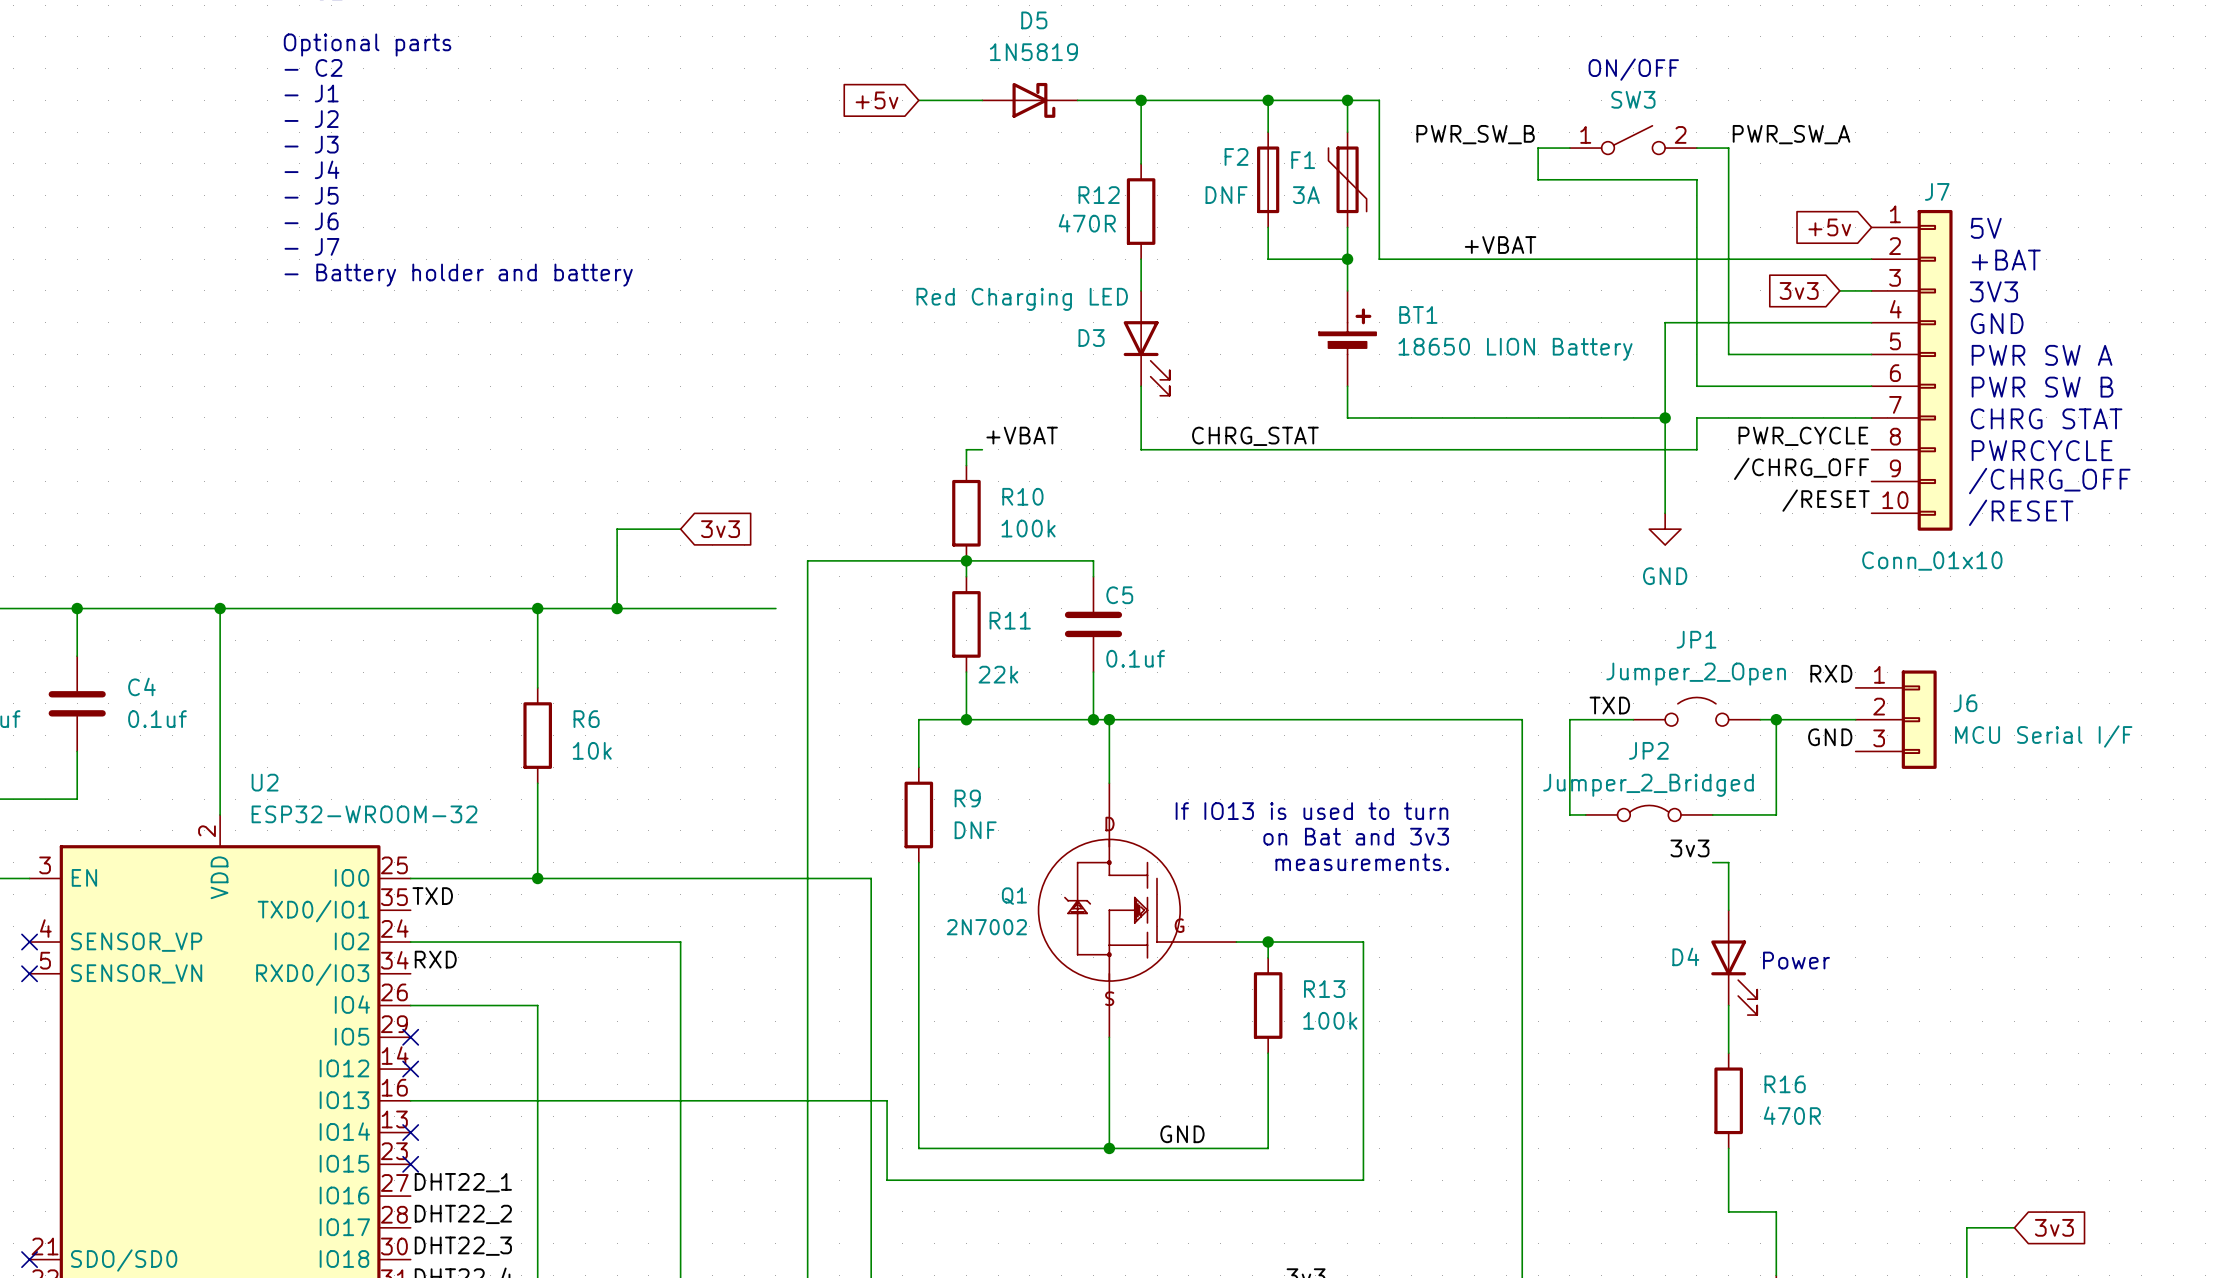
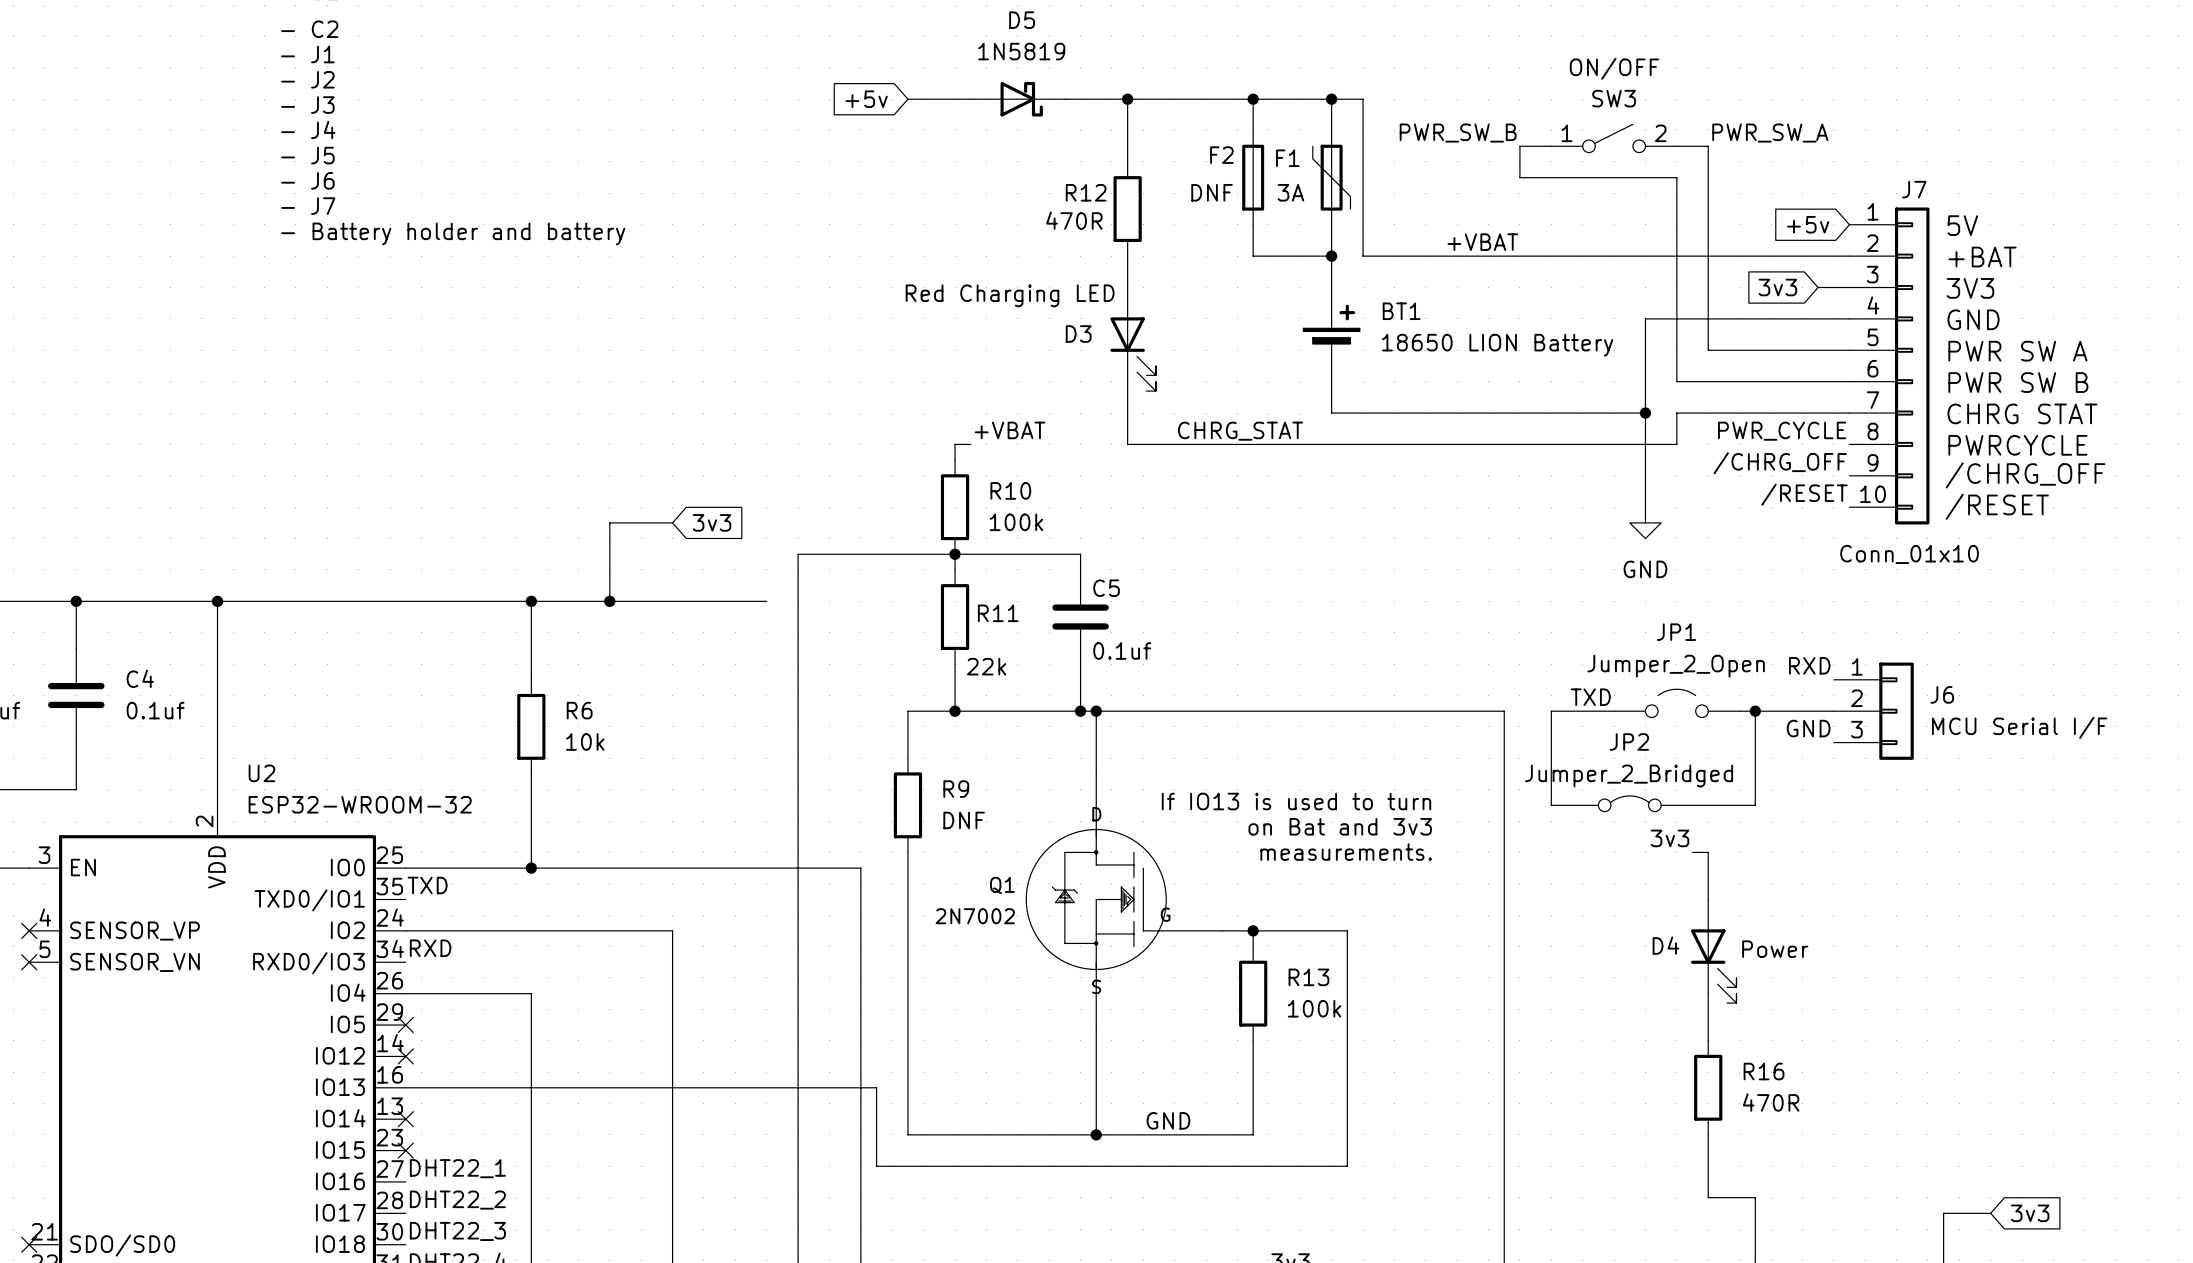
text: Optional parts (367, 45) -> none
text position: - C2 (313, 67) -> - C2 (309, 29)
text position: - J1 (311, 93) -> - J1 (307, 54)
text position: - J2 (311, 119) -> - J2 (307, 79)
text position: - J3 (311, 144) -> - J3 (307, 105)
text position: - J4 (311, 169) -> - J4 (308, 129)
text position: - J5 (311, 195) -> - J5 (307, 155)
text position: - J6 (311, 221) -> - J6 (307, 180)
text position: - J7 (311, 246) -> - J7 (308, 206)
text position: - Battery holder and battery (458, 275) -> - Battery holder and battery (453, 233)

